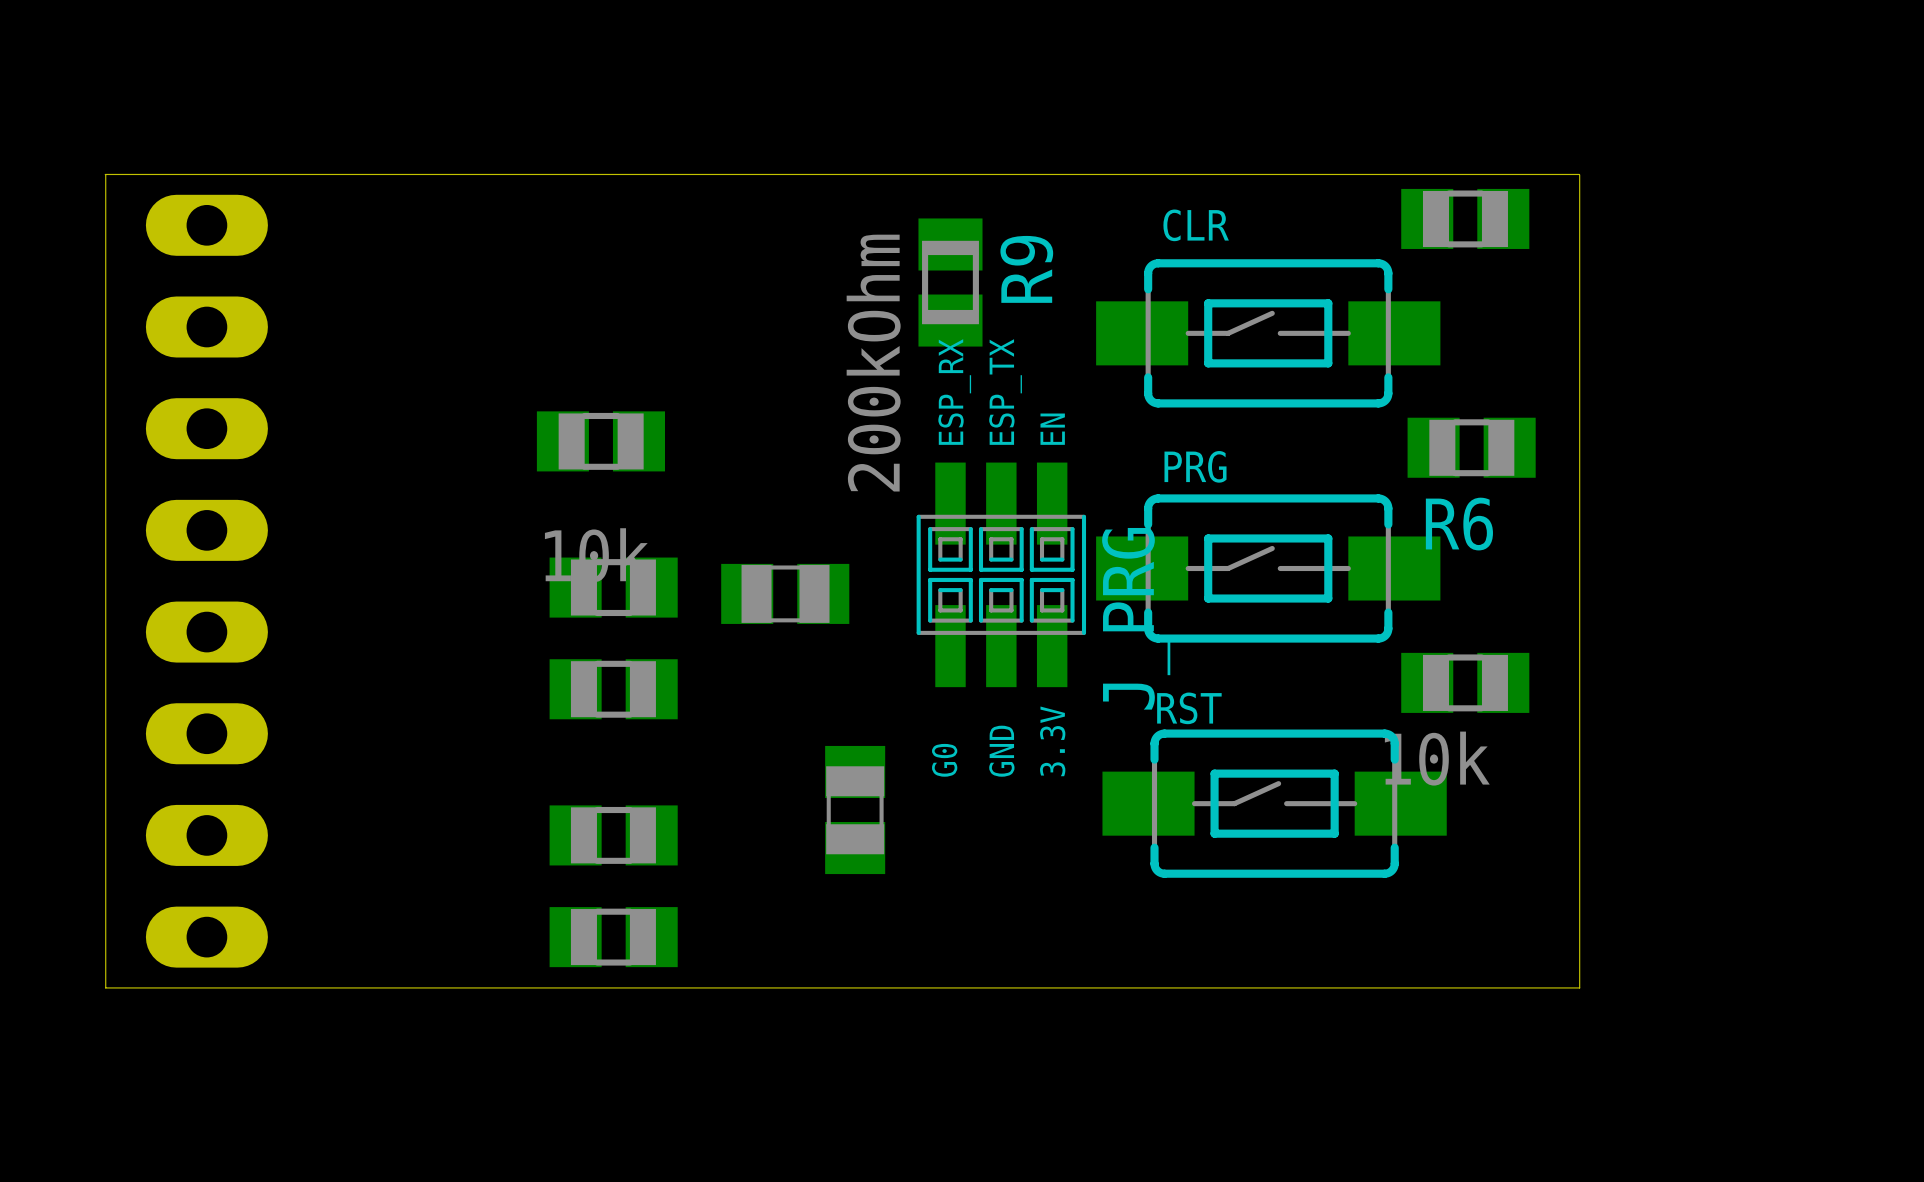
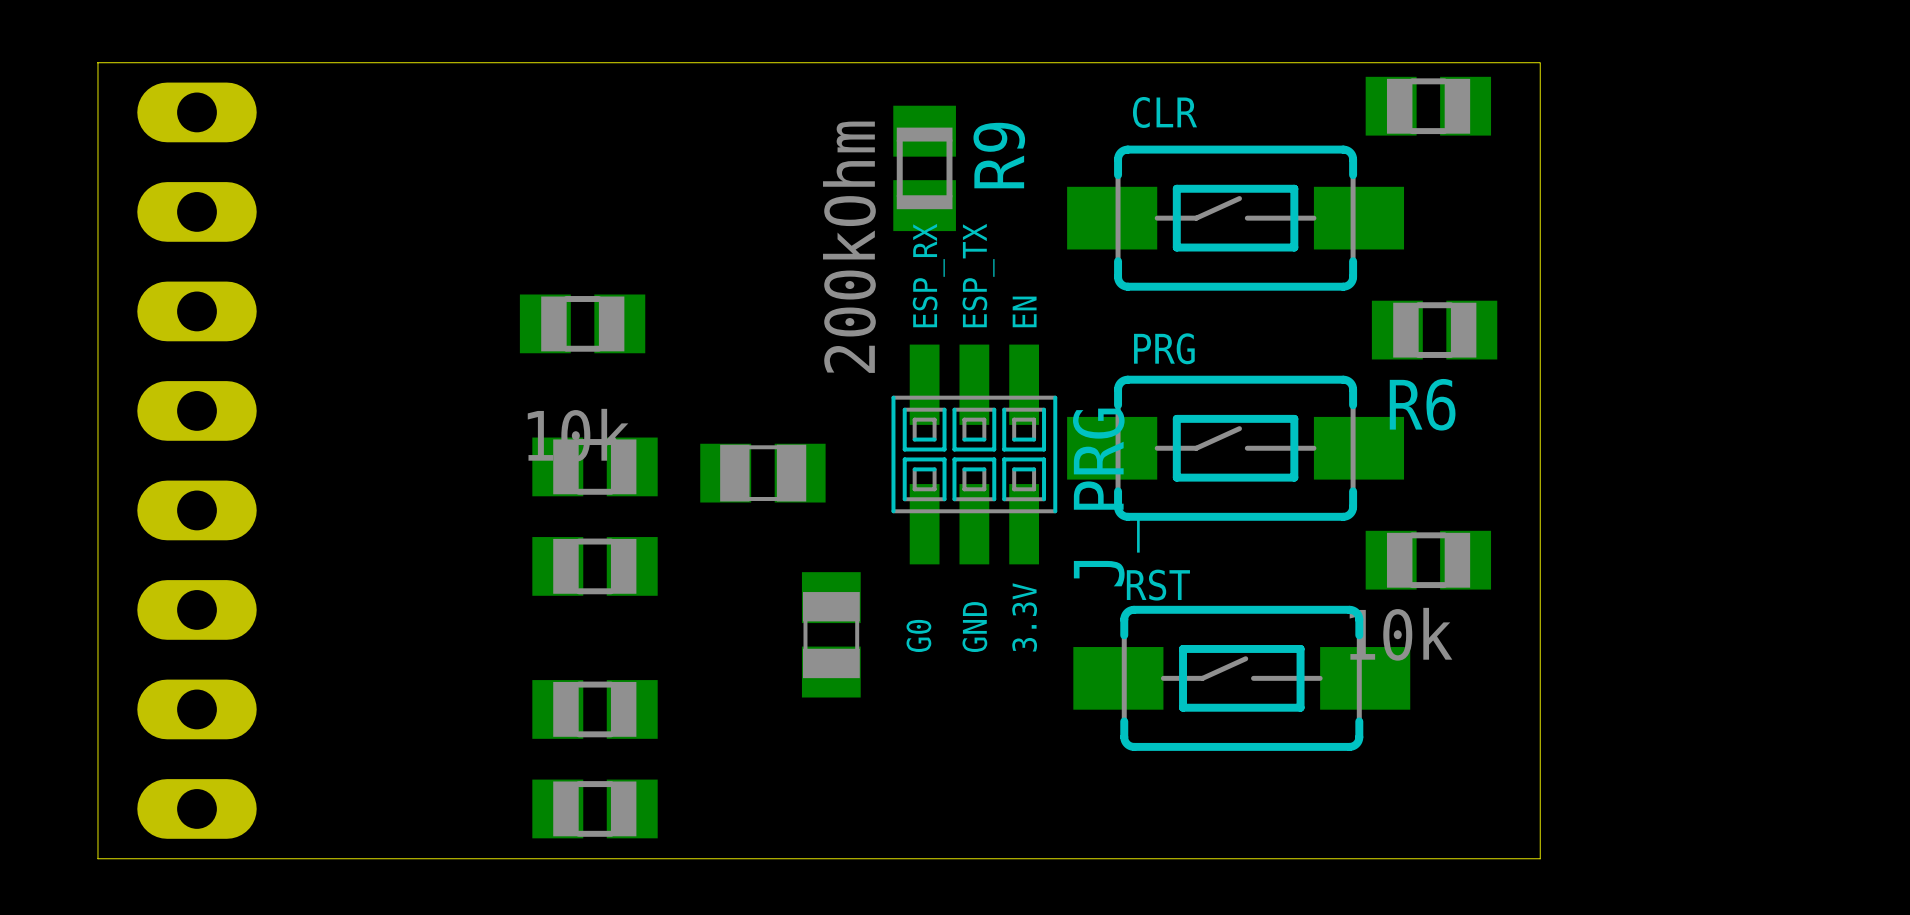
part position: (855, 810) -> (831, 634)

